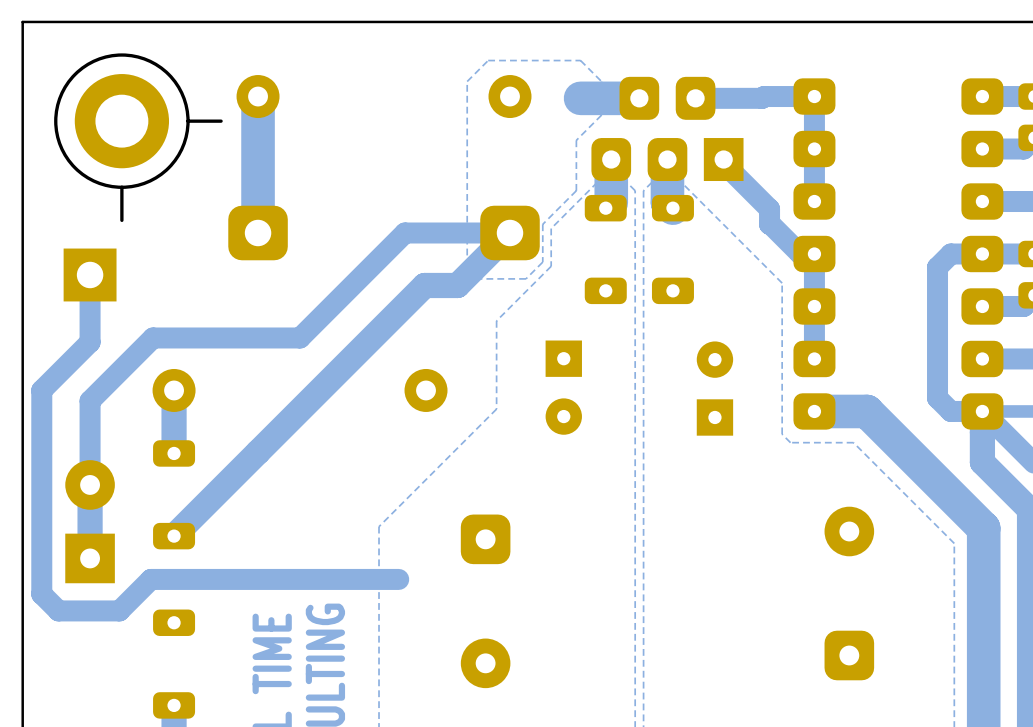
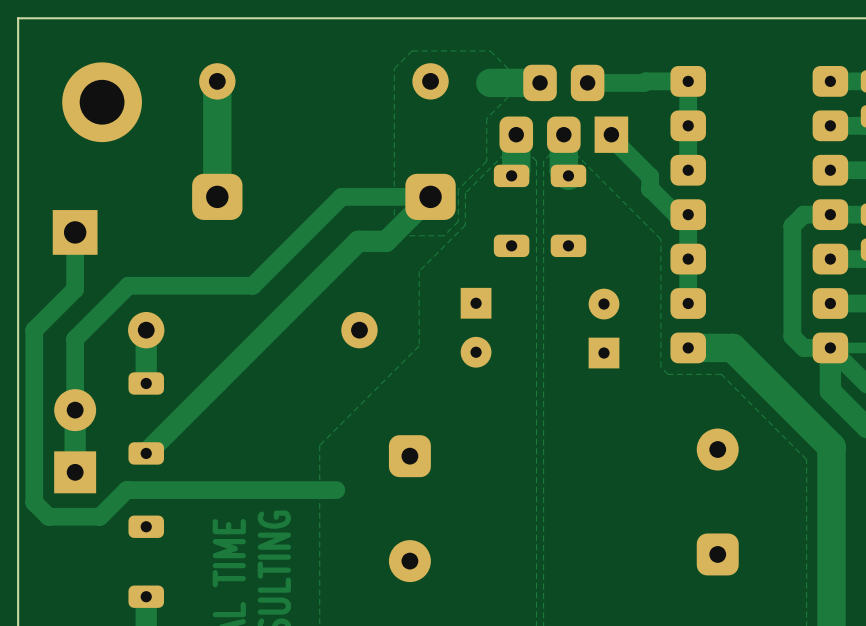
drawing: [54, 53, 190, 189] -> none
line: (221, 121) (188, 121) -> none
line: (121, 187) (121, 220) -> none

